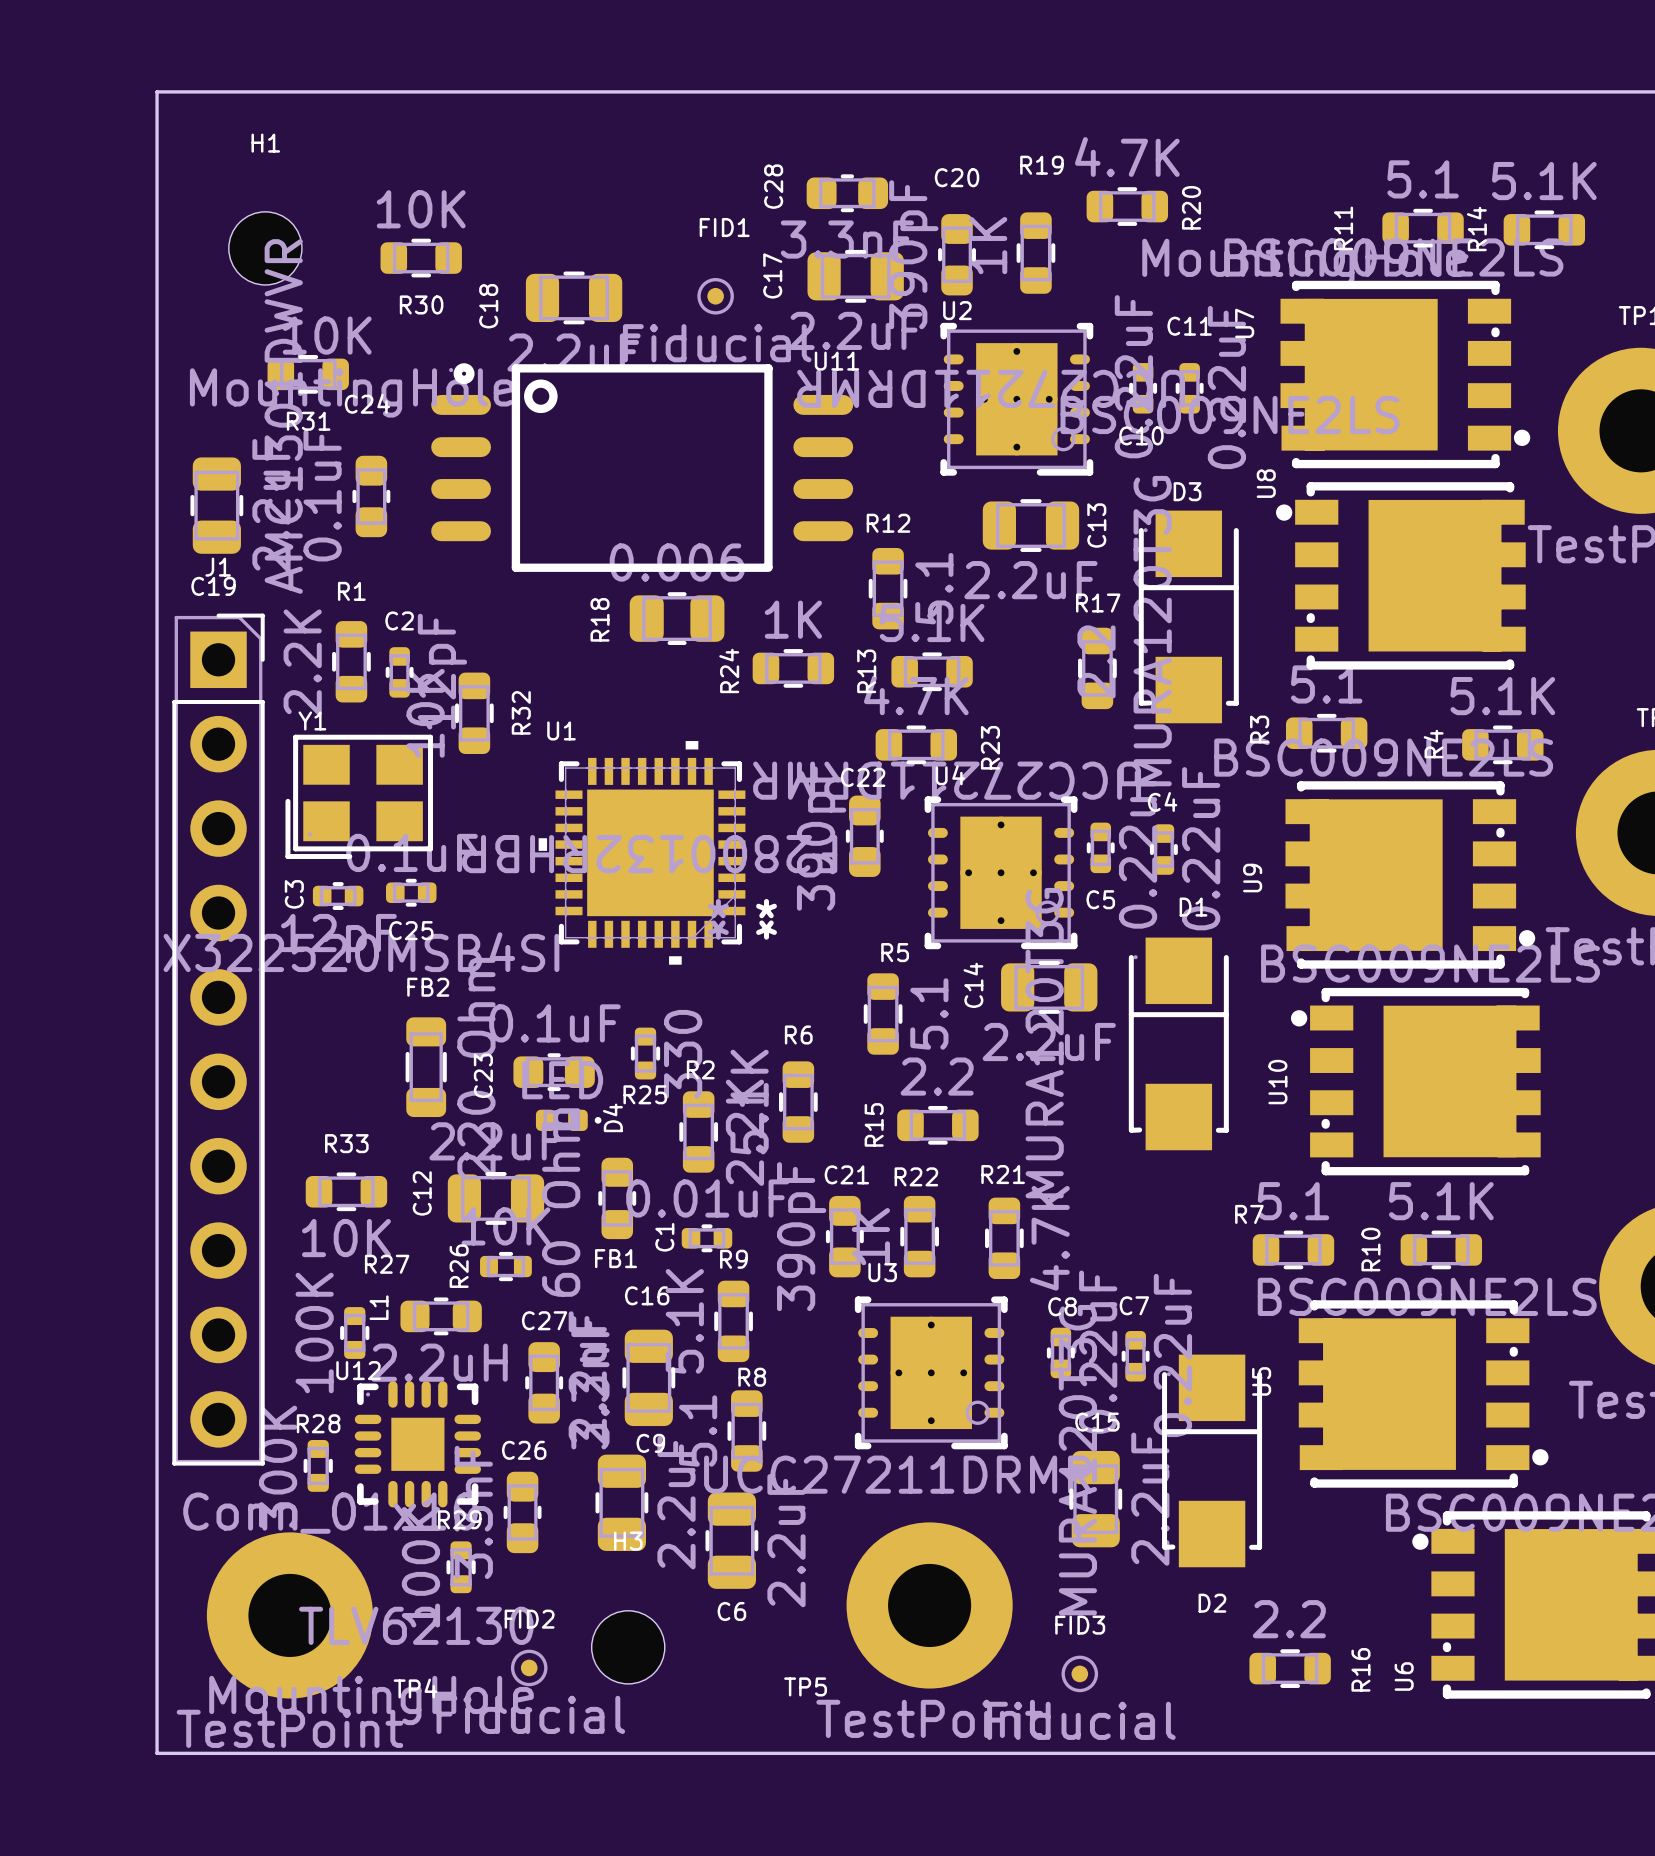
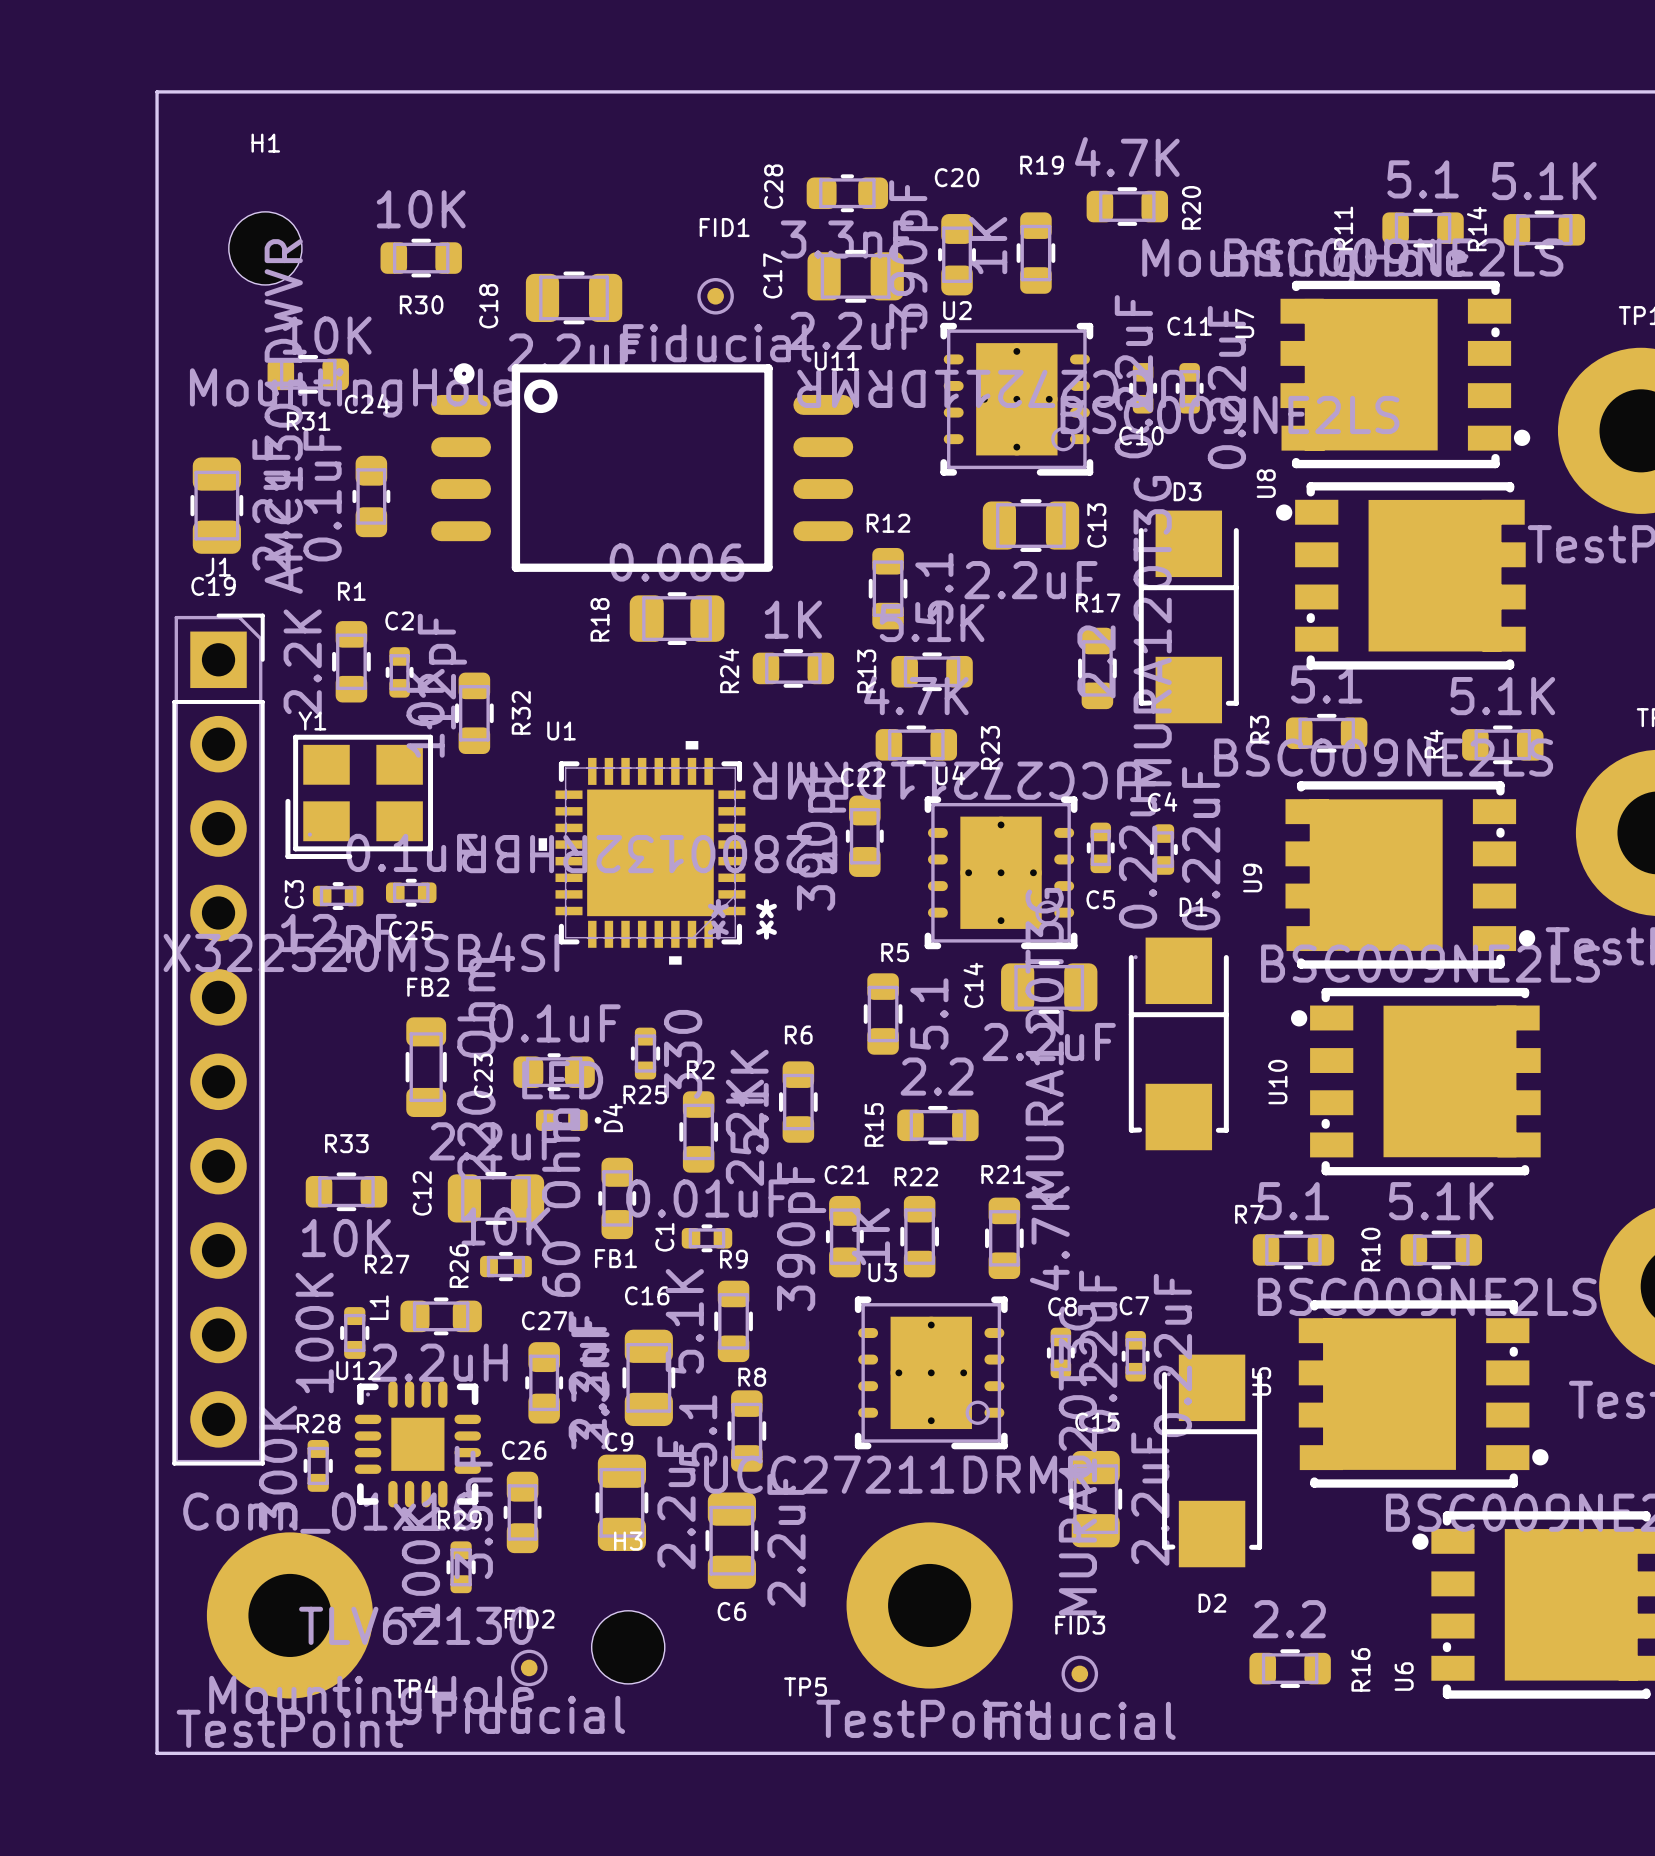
C9 name position: C9 (650, 1443) -> C9 (618, 1442)

